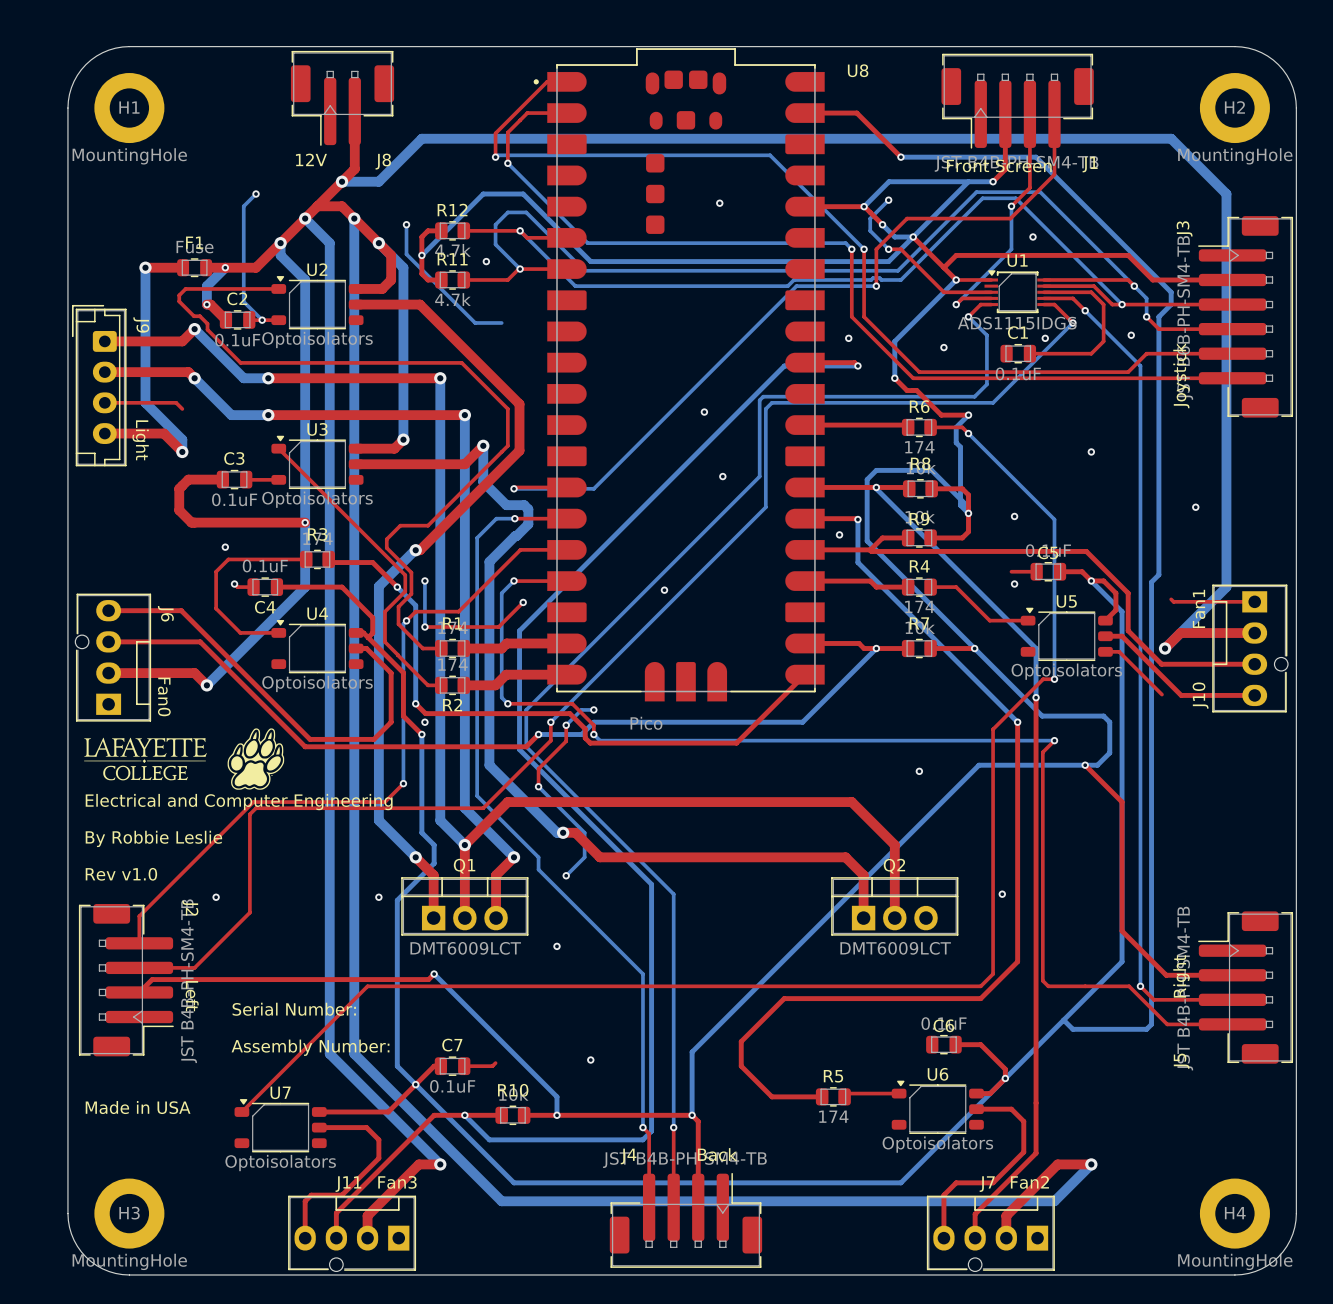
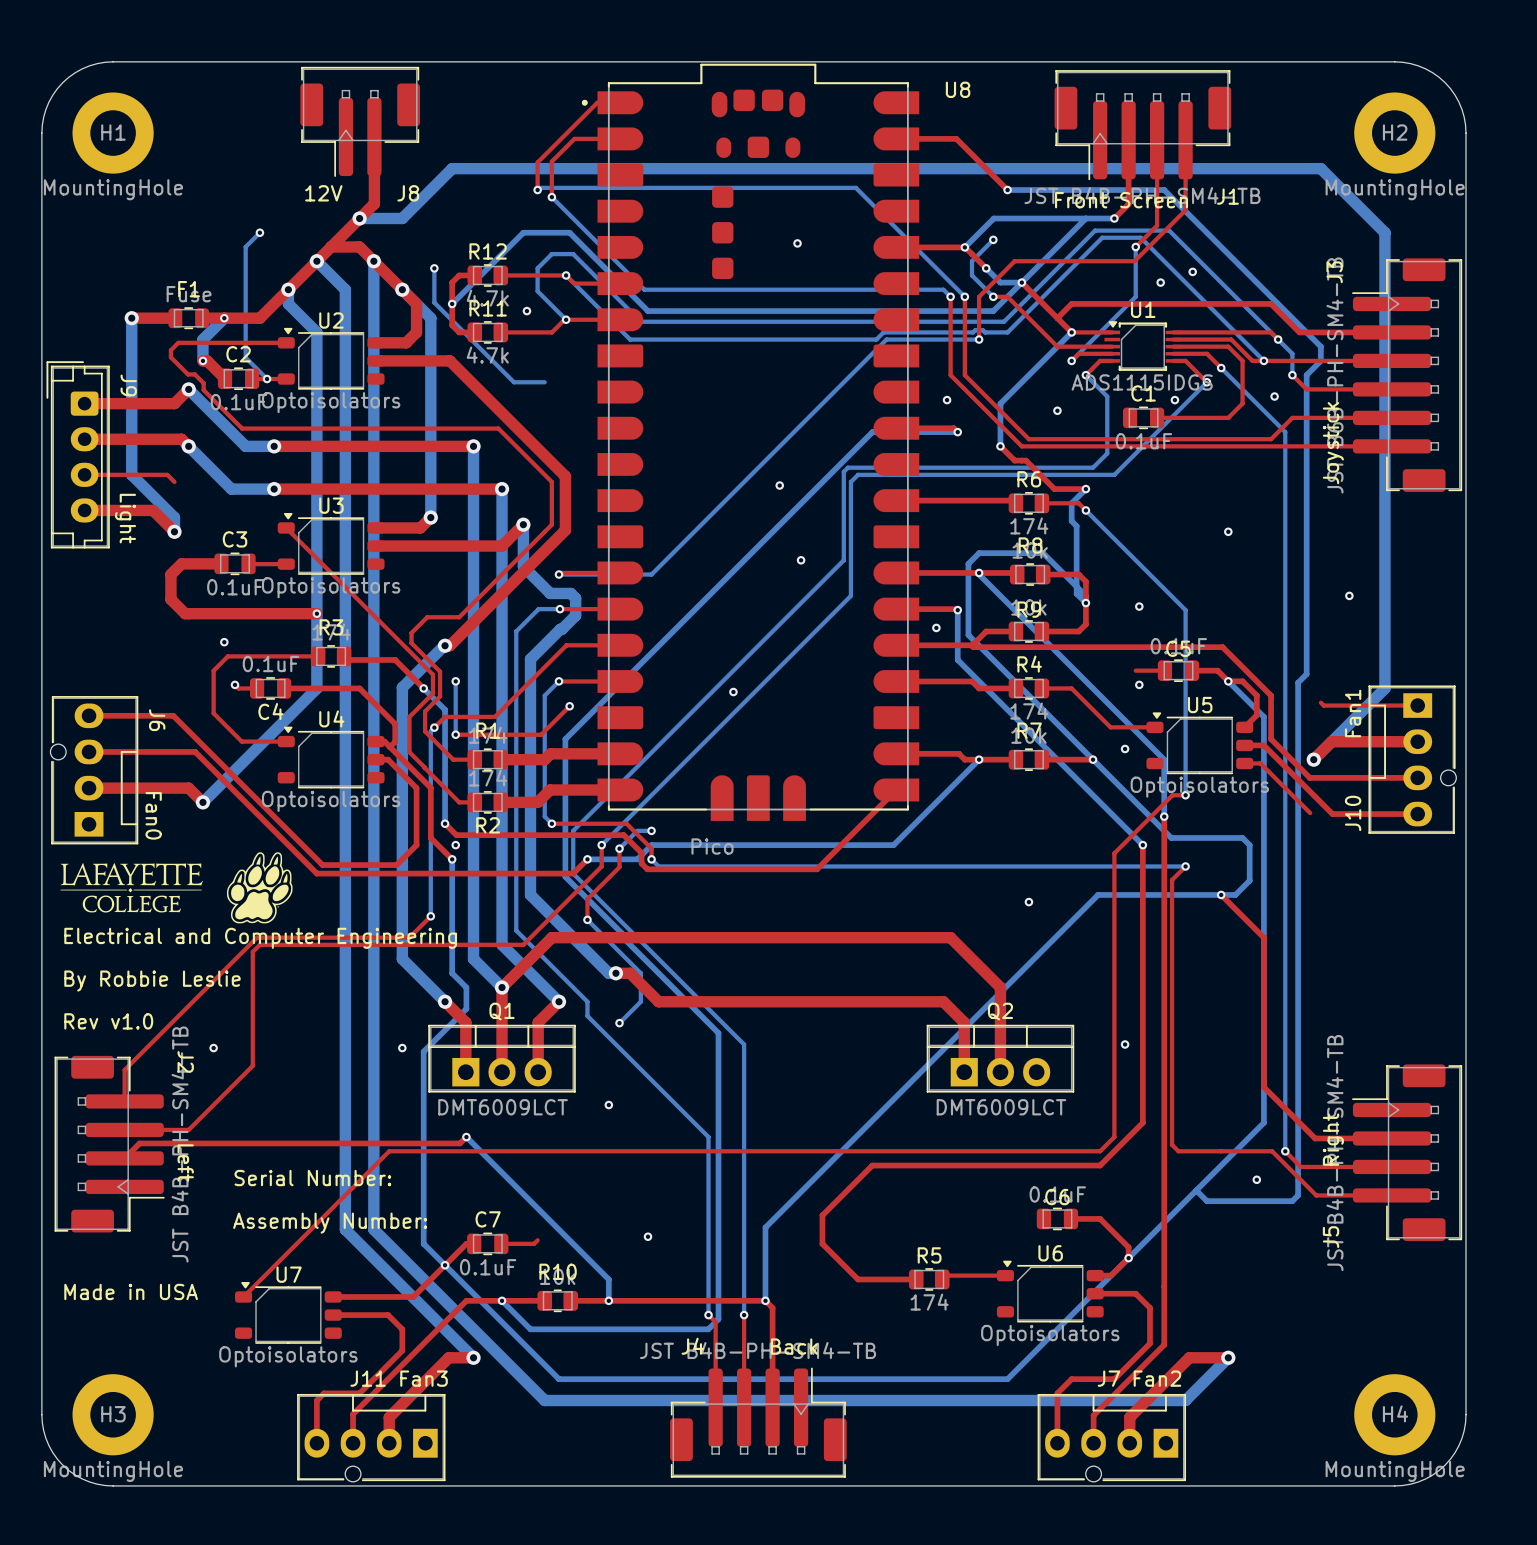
via: none -> (1192, 271)
via: none -> (1125, 748)
via: none -> (1256, 1179)

